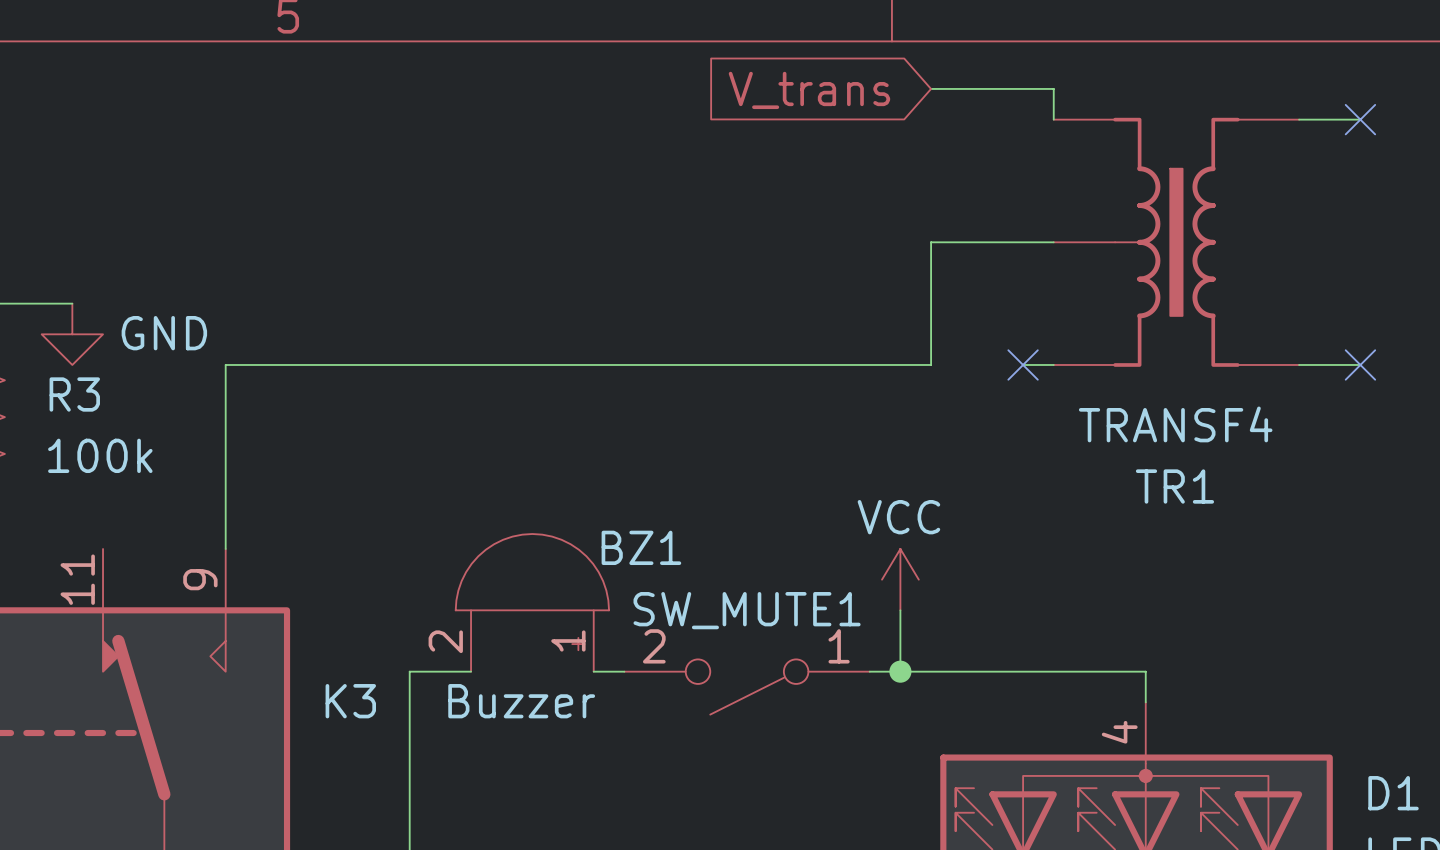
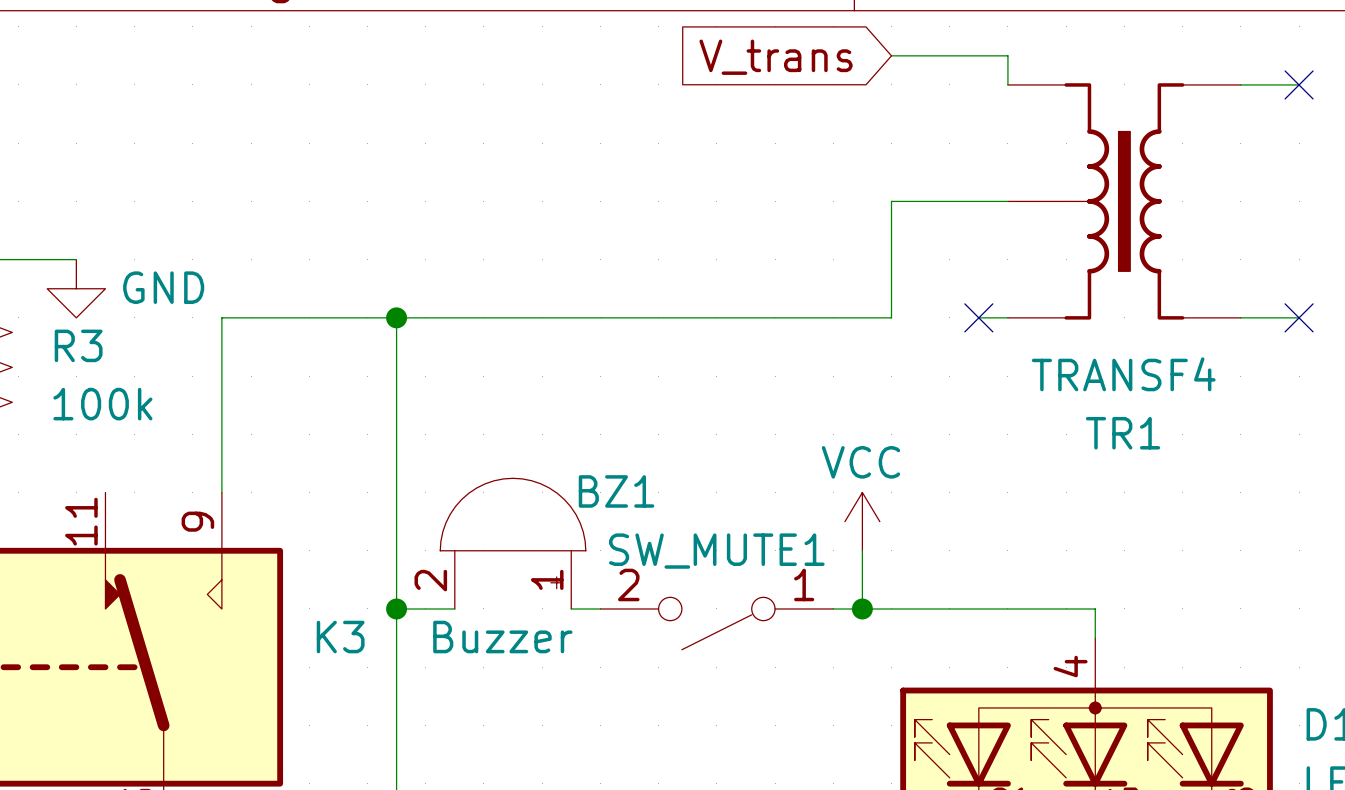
wire: none -> (396, 317) (396, 608)
junction: none -> (396, 317)
junction: none -> (396, 608)

